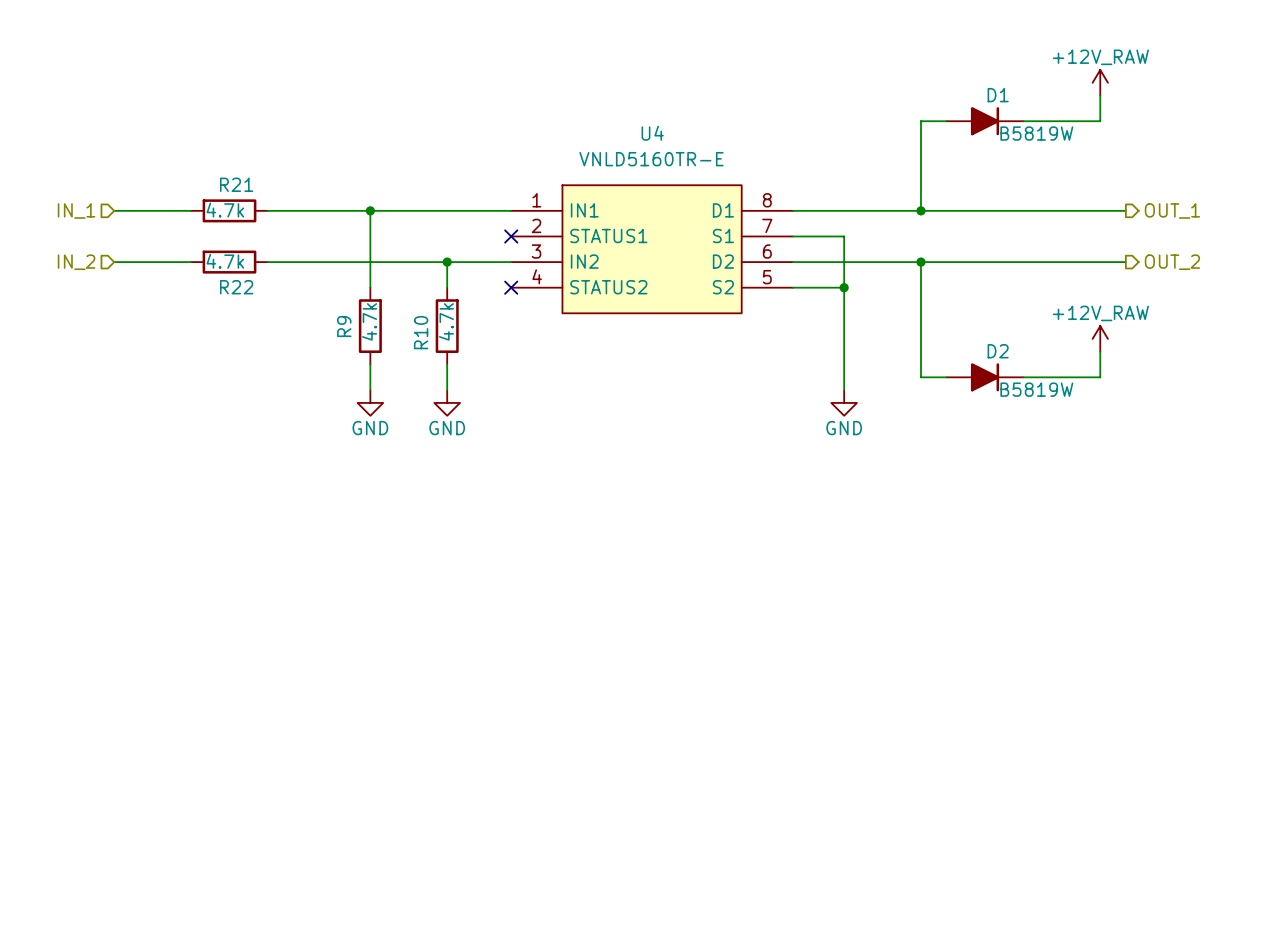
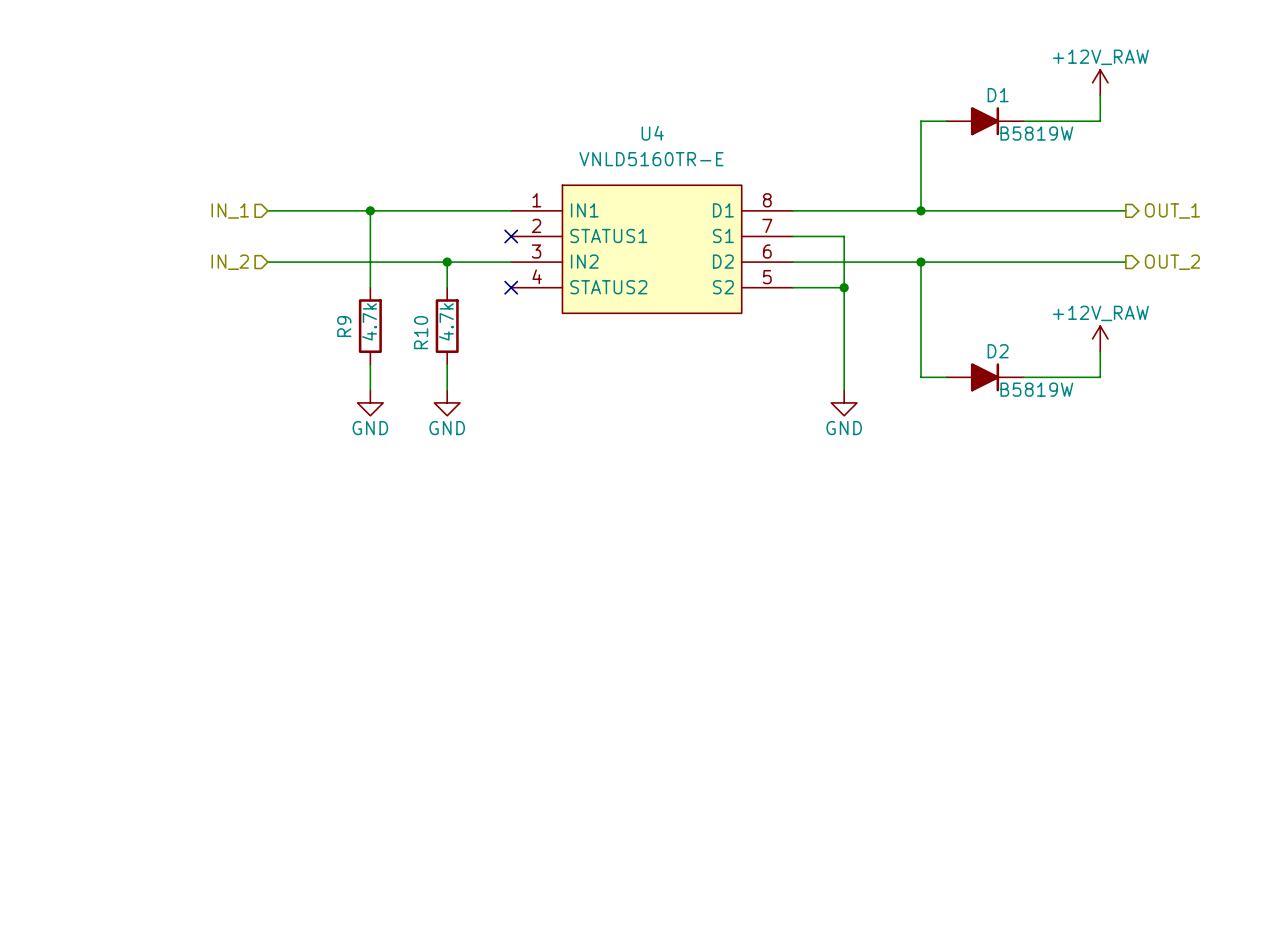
hierarchical label position: IN_1 (76, 210) -> IN_1 (230, 210)
wire: (114, 210) (191, 210) -> none
R21: 4.7k (229, 210) -> none
hierarchical label position: IN_2 (76, 262) -> IN_2 (230, 262)
wire: (114, 262) (191, 262) -> none
R22: 4.7k (229, 262) -> none

